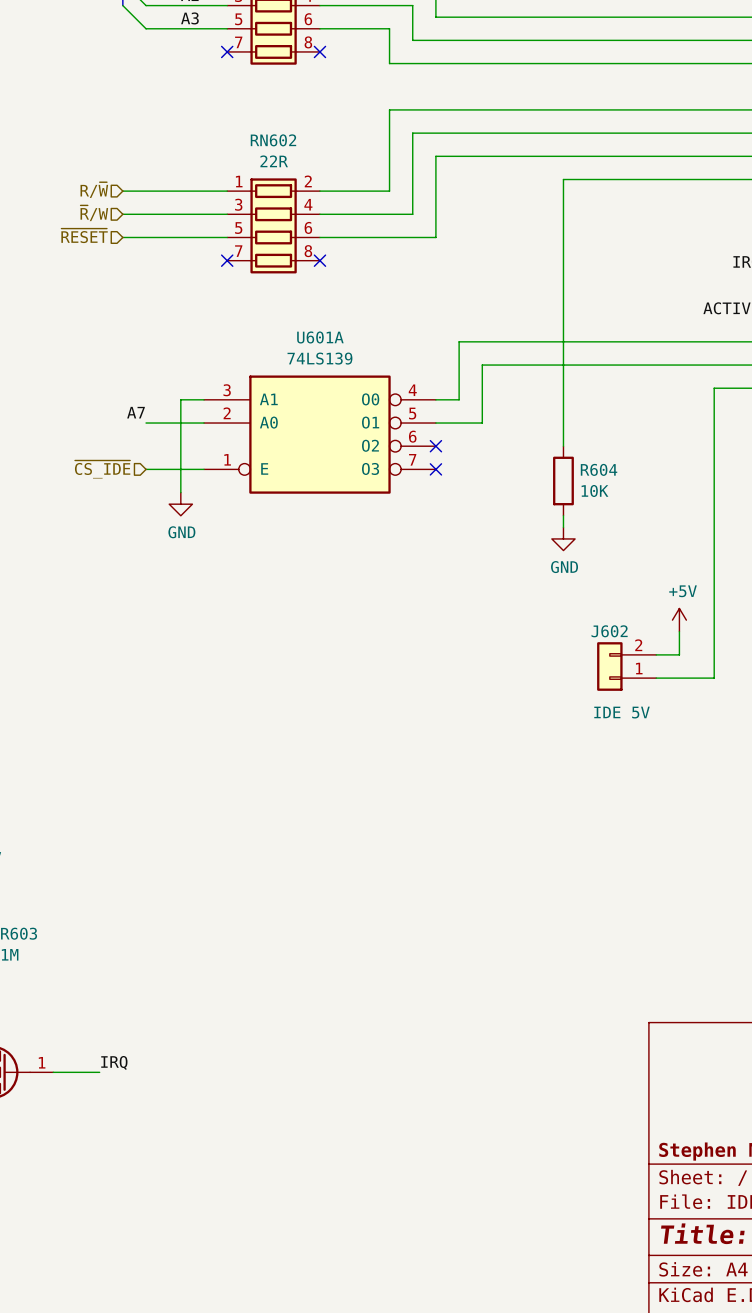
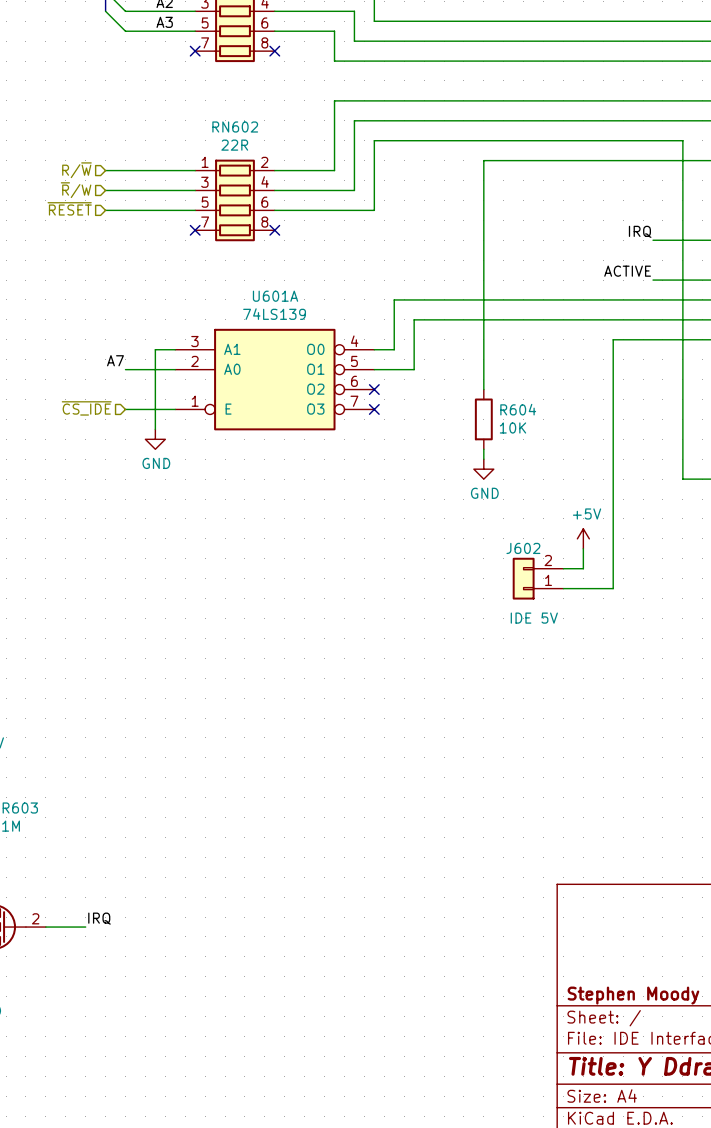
part pin number: 1 (42, 1062) -> 2 (35, 918)

